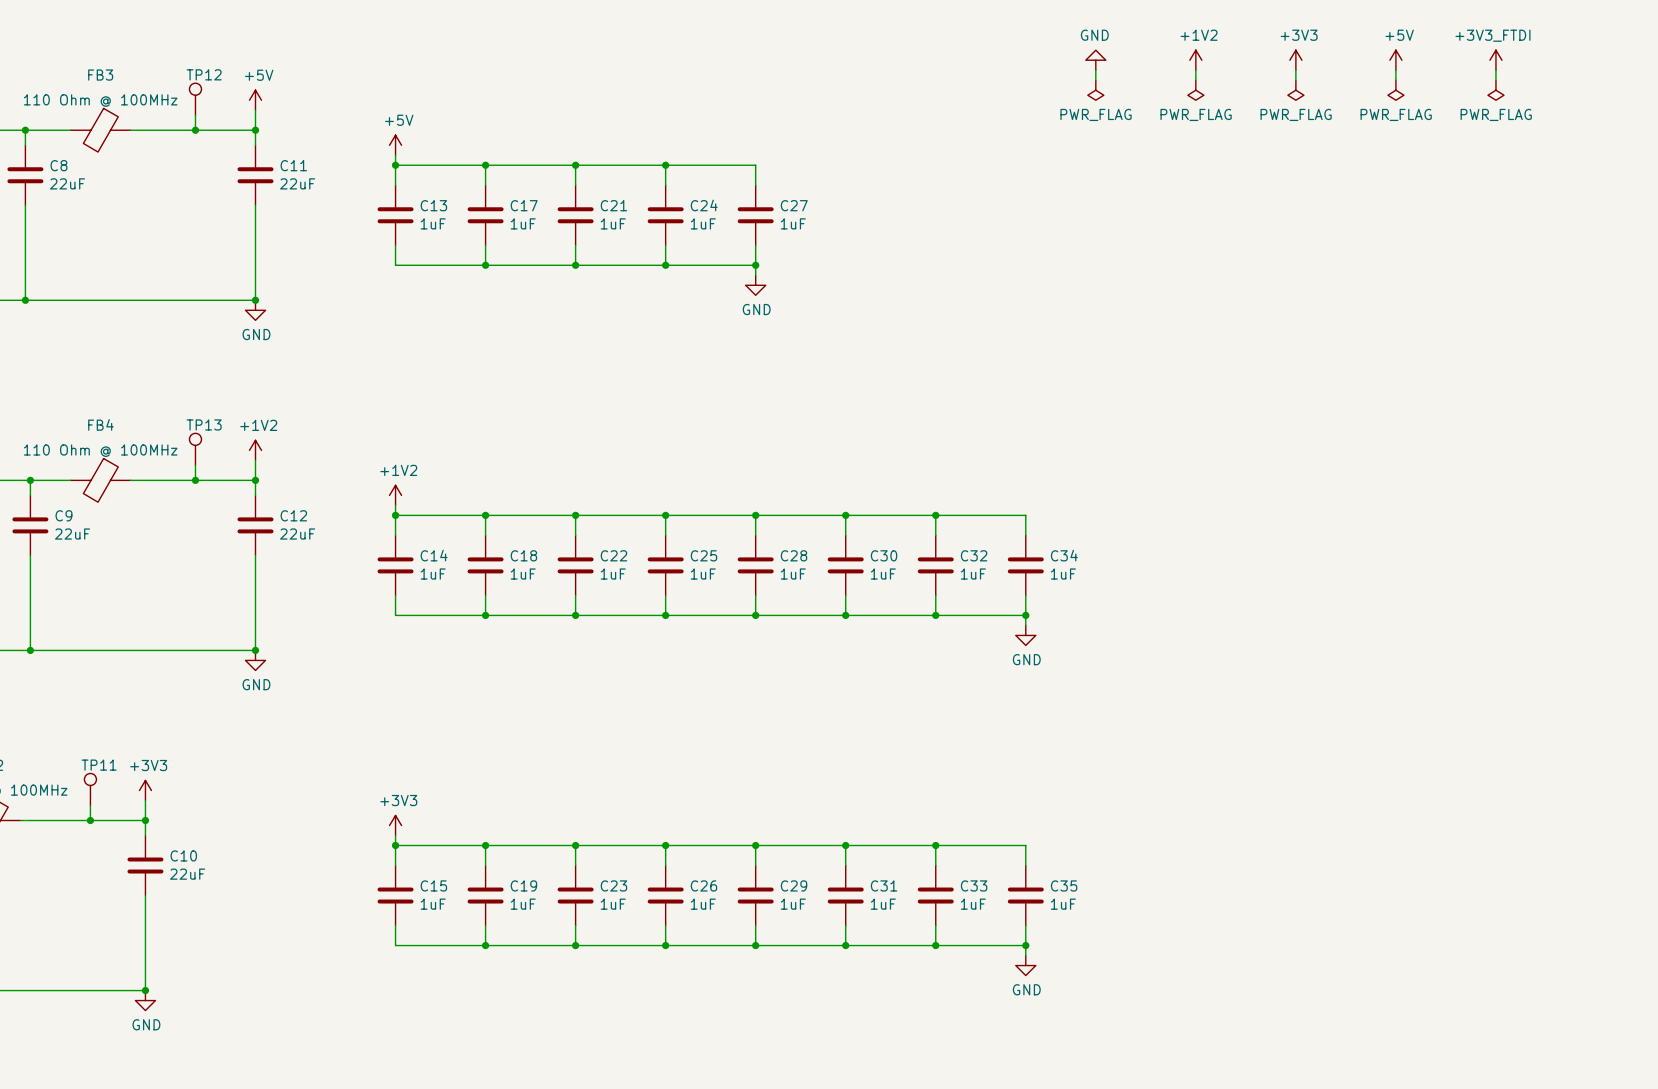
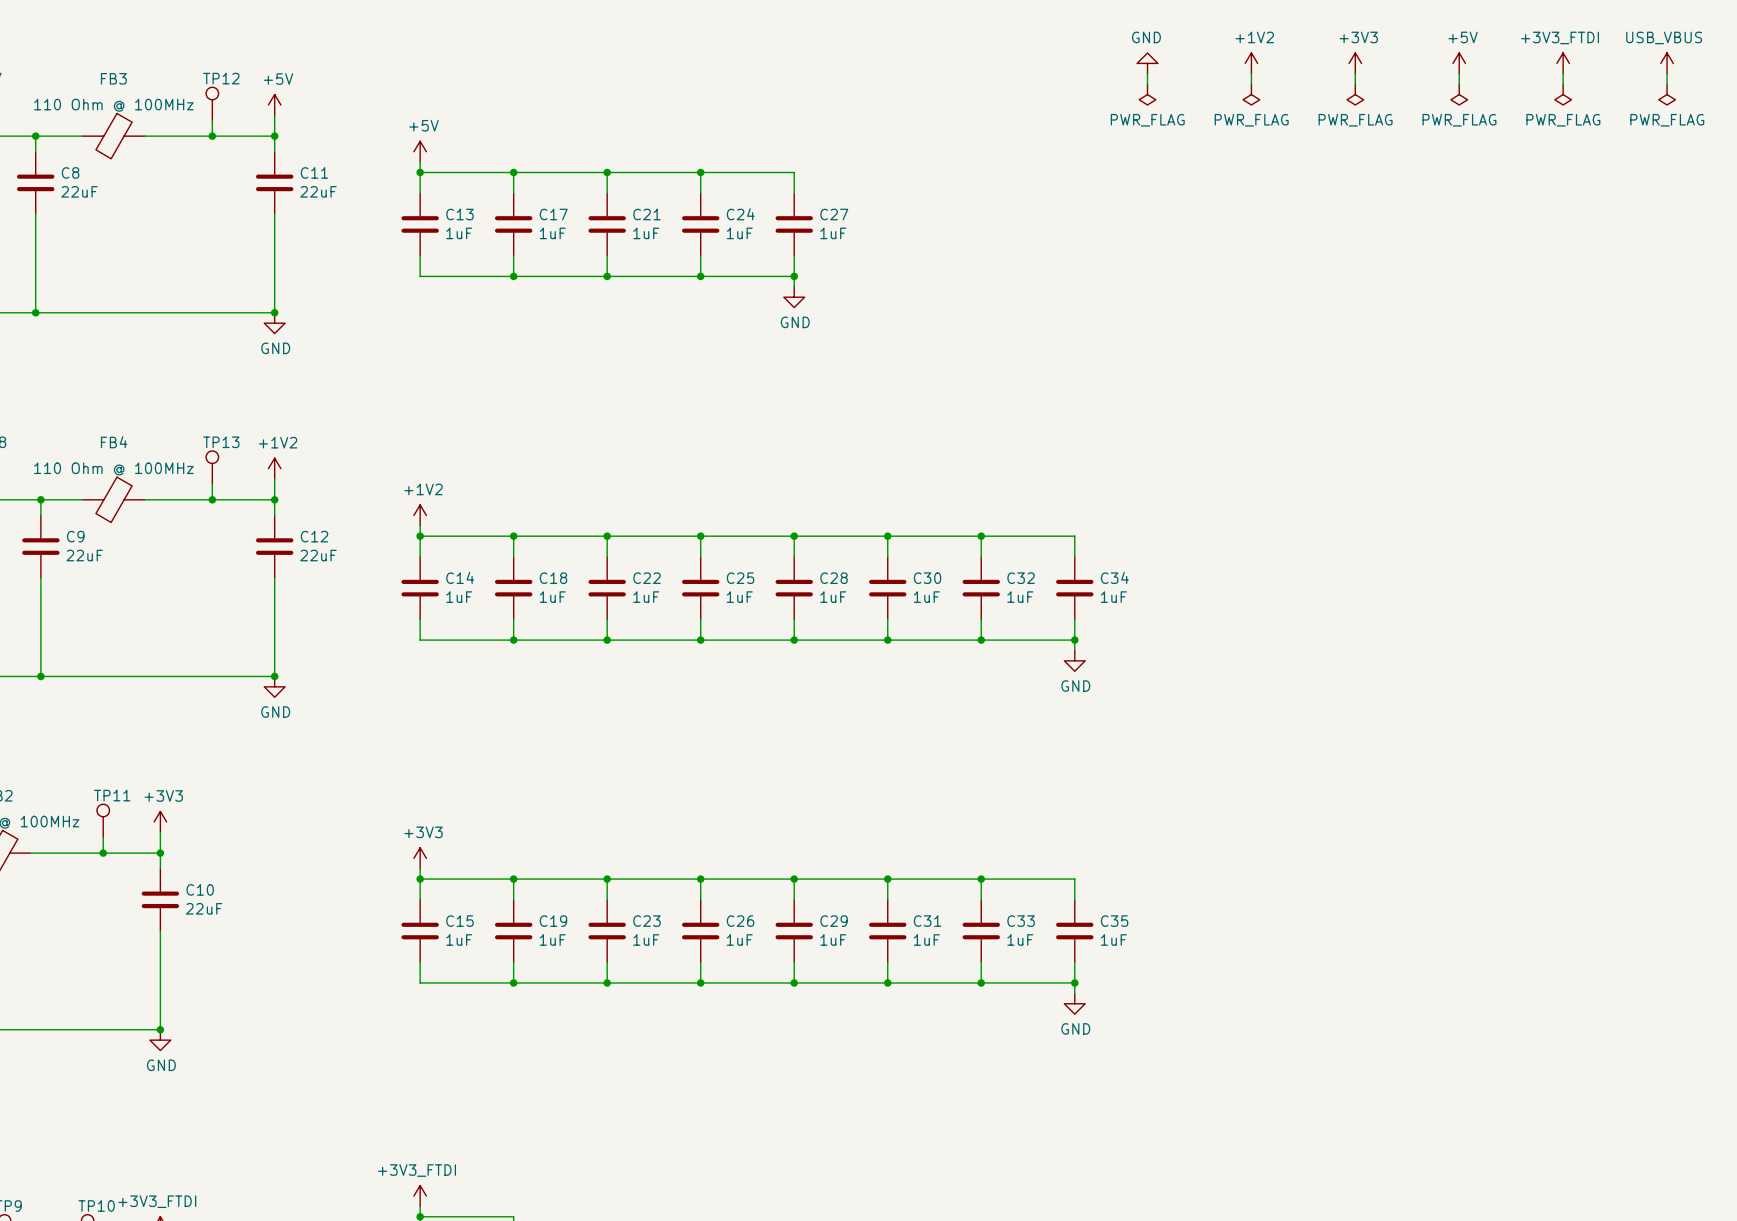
power symbol: none -> USB_VBUS (1667, 63)
wire: none -> (1667, 73) (1667, 84)
power symbol: none -> PWR_FLAG (1667, 94)

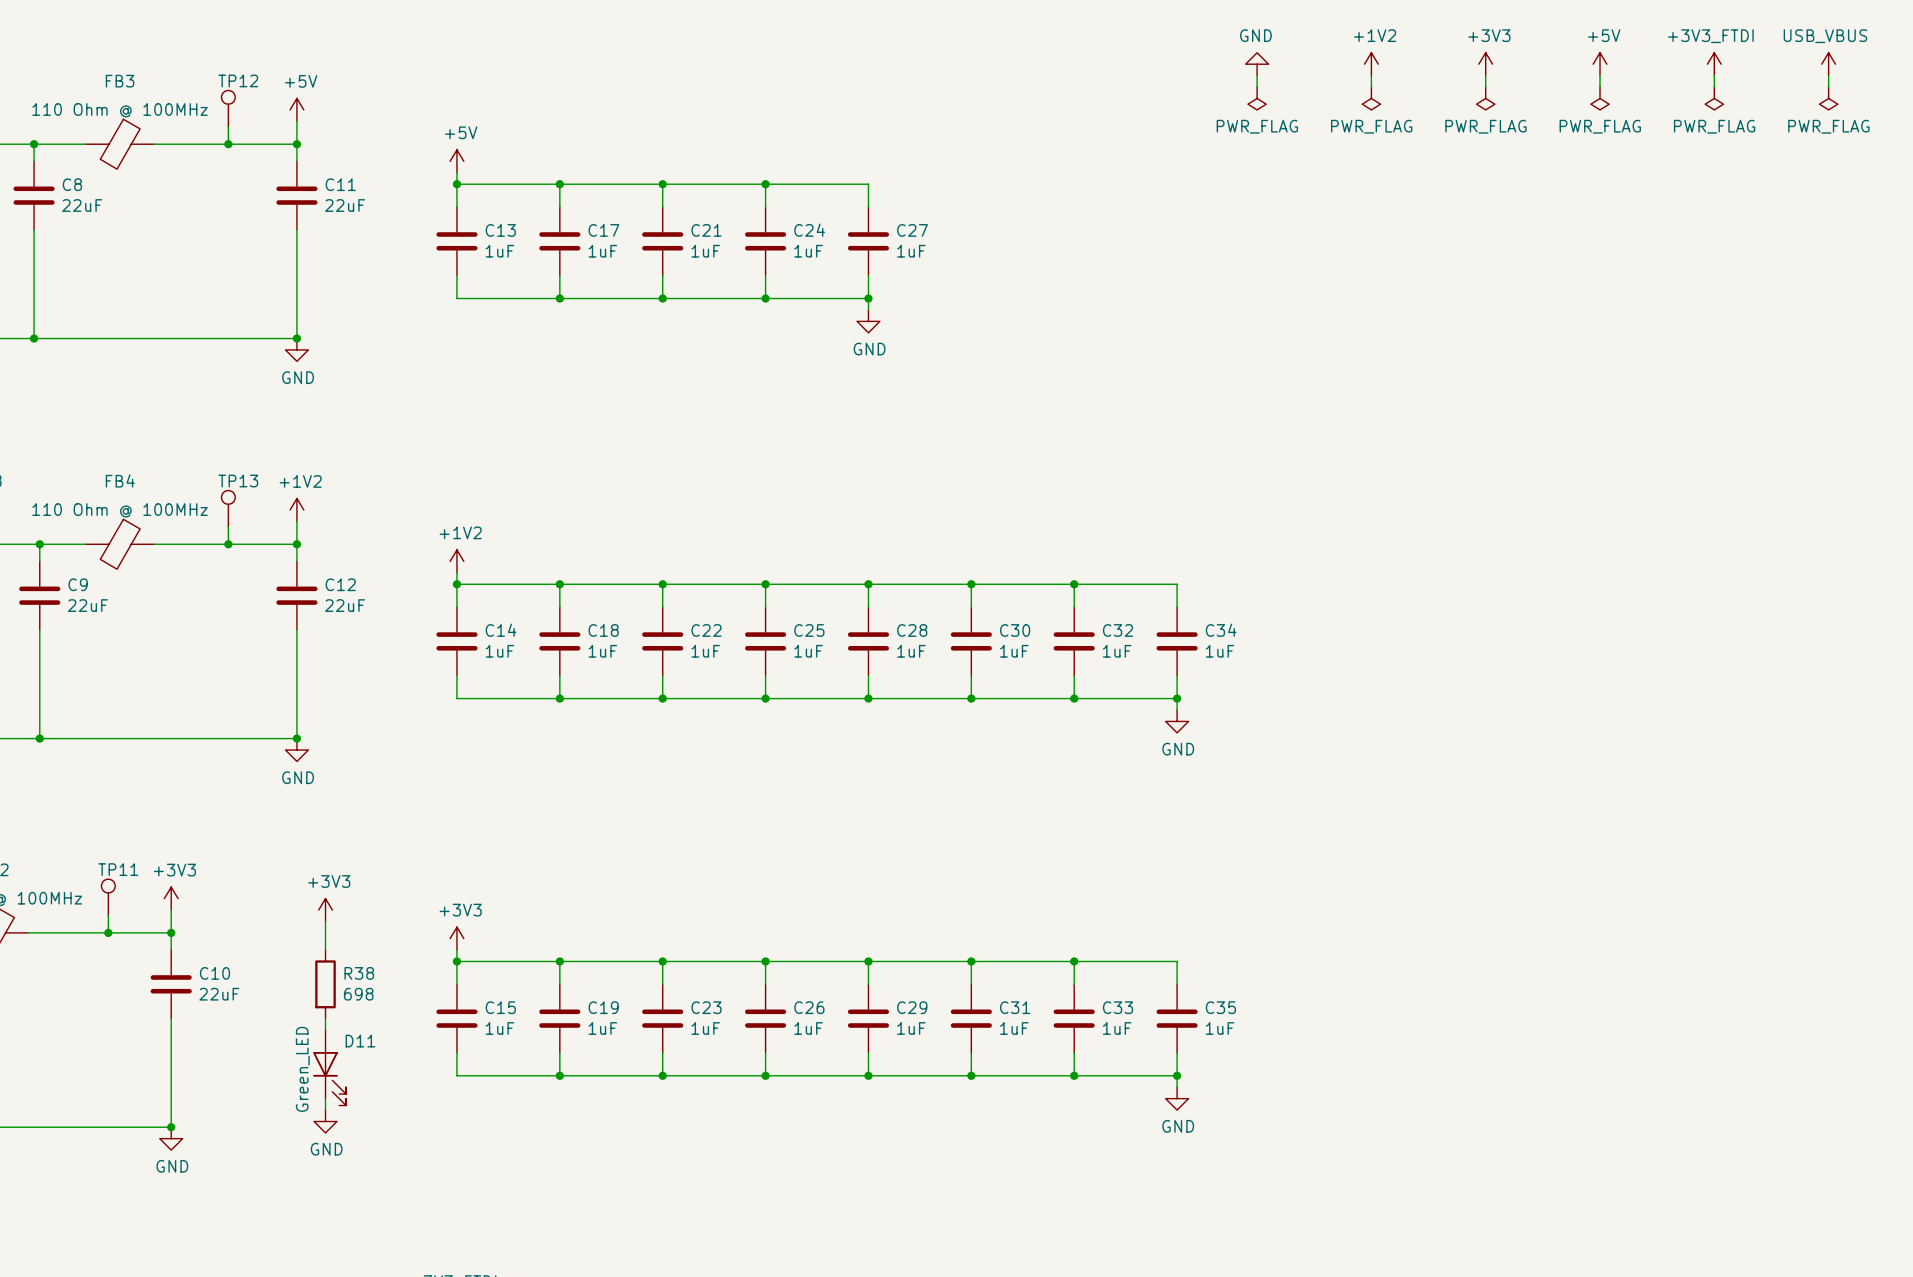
power symbol: none -> +3V3 (325, 910)
wire: none -> (325, 921) (325, 950)
R38: none -> (325, 984)
wire: none -> (325, 1018) (325, 1030)
D11: none -> Green_LED (329, 1067)
wire: none -> (325, 1098) (325, 1110)
power symbol: none -> GND (325, 1121)

